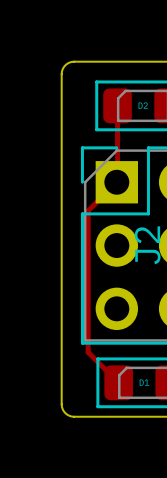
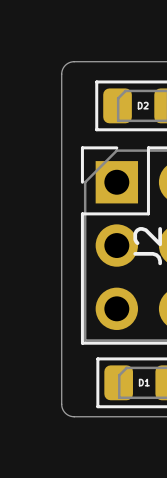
track: (117, 105) (117, 181) (88, 210) (88, 352) (118, 382) -> none

